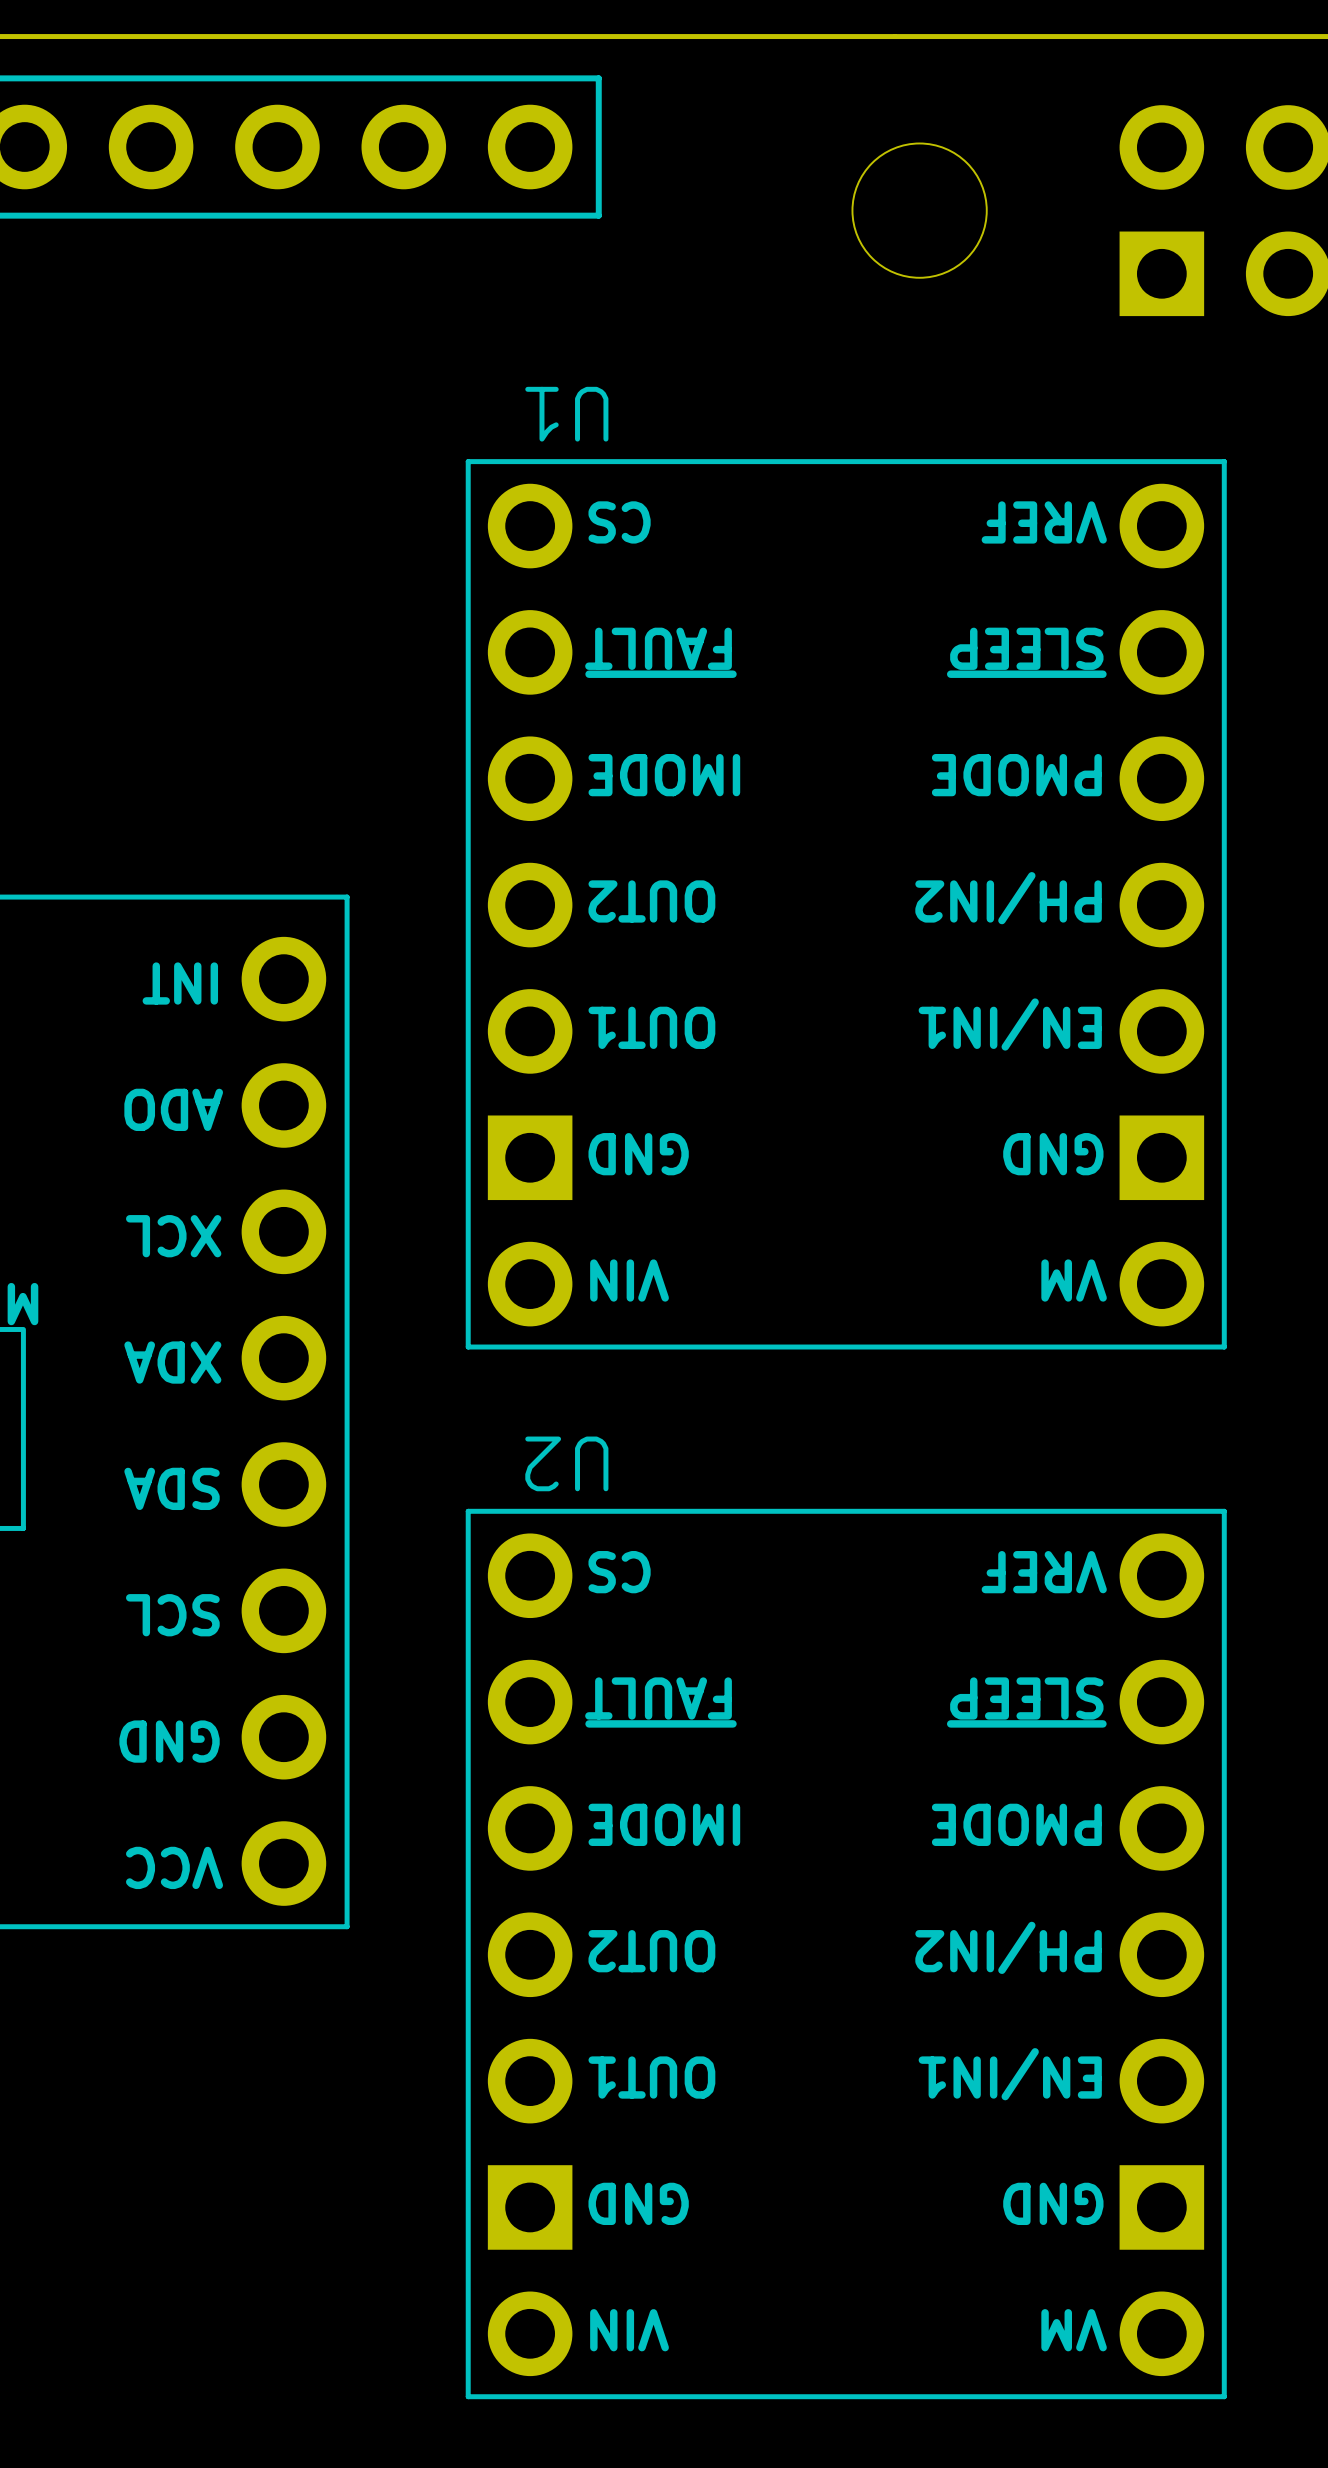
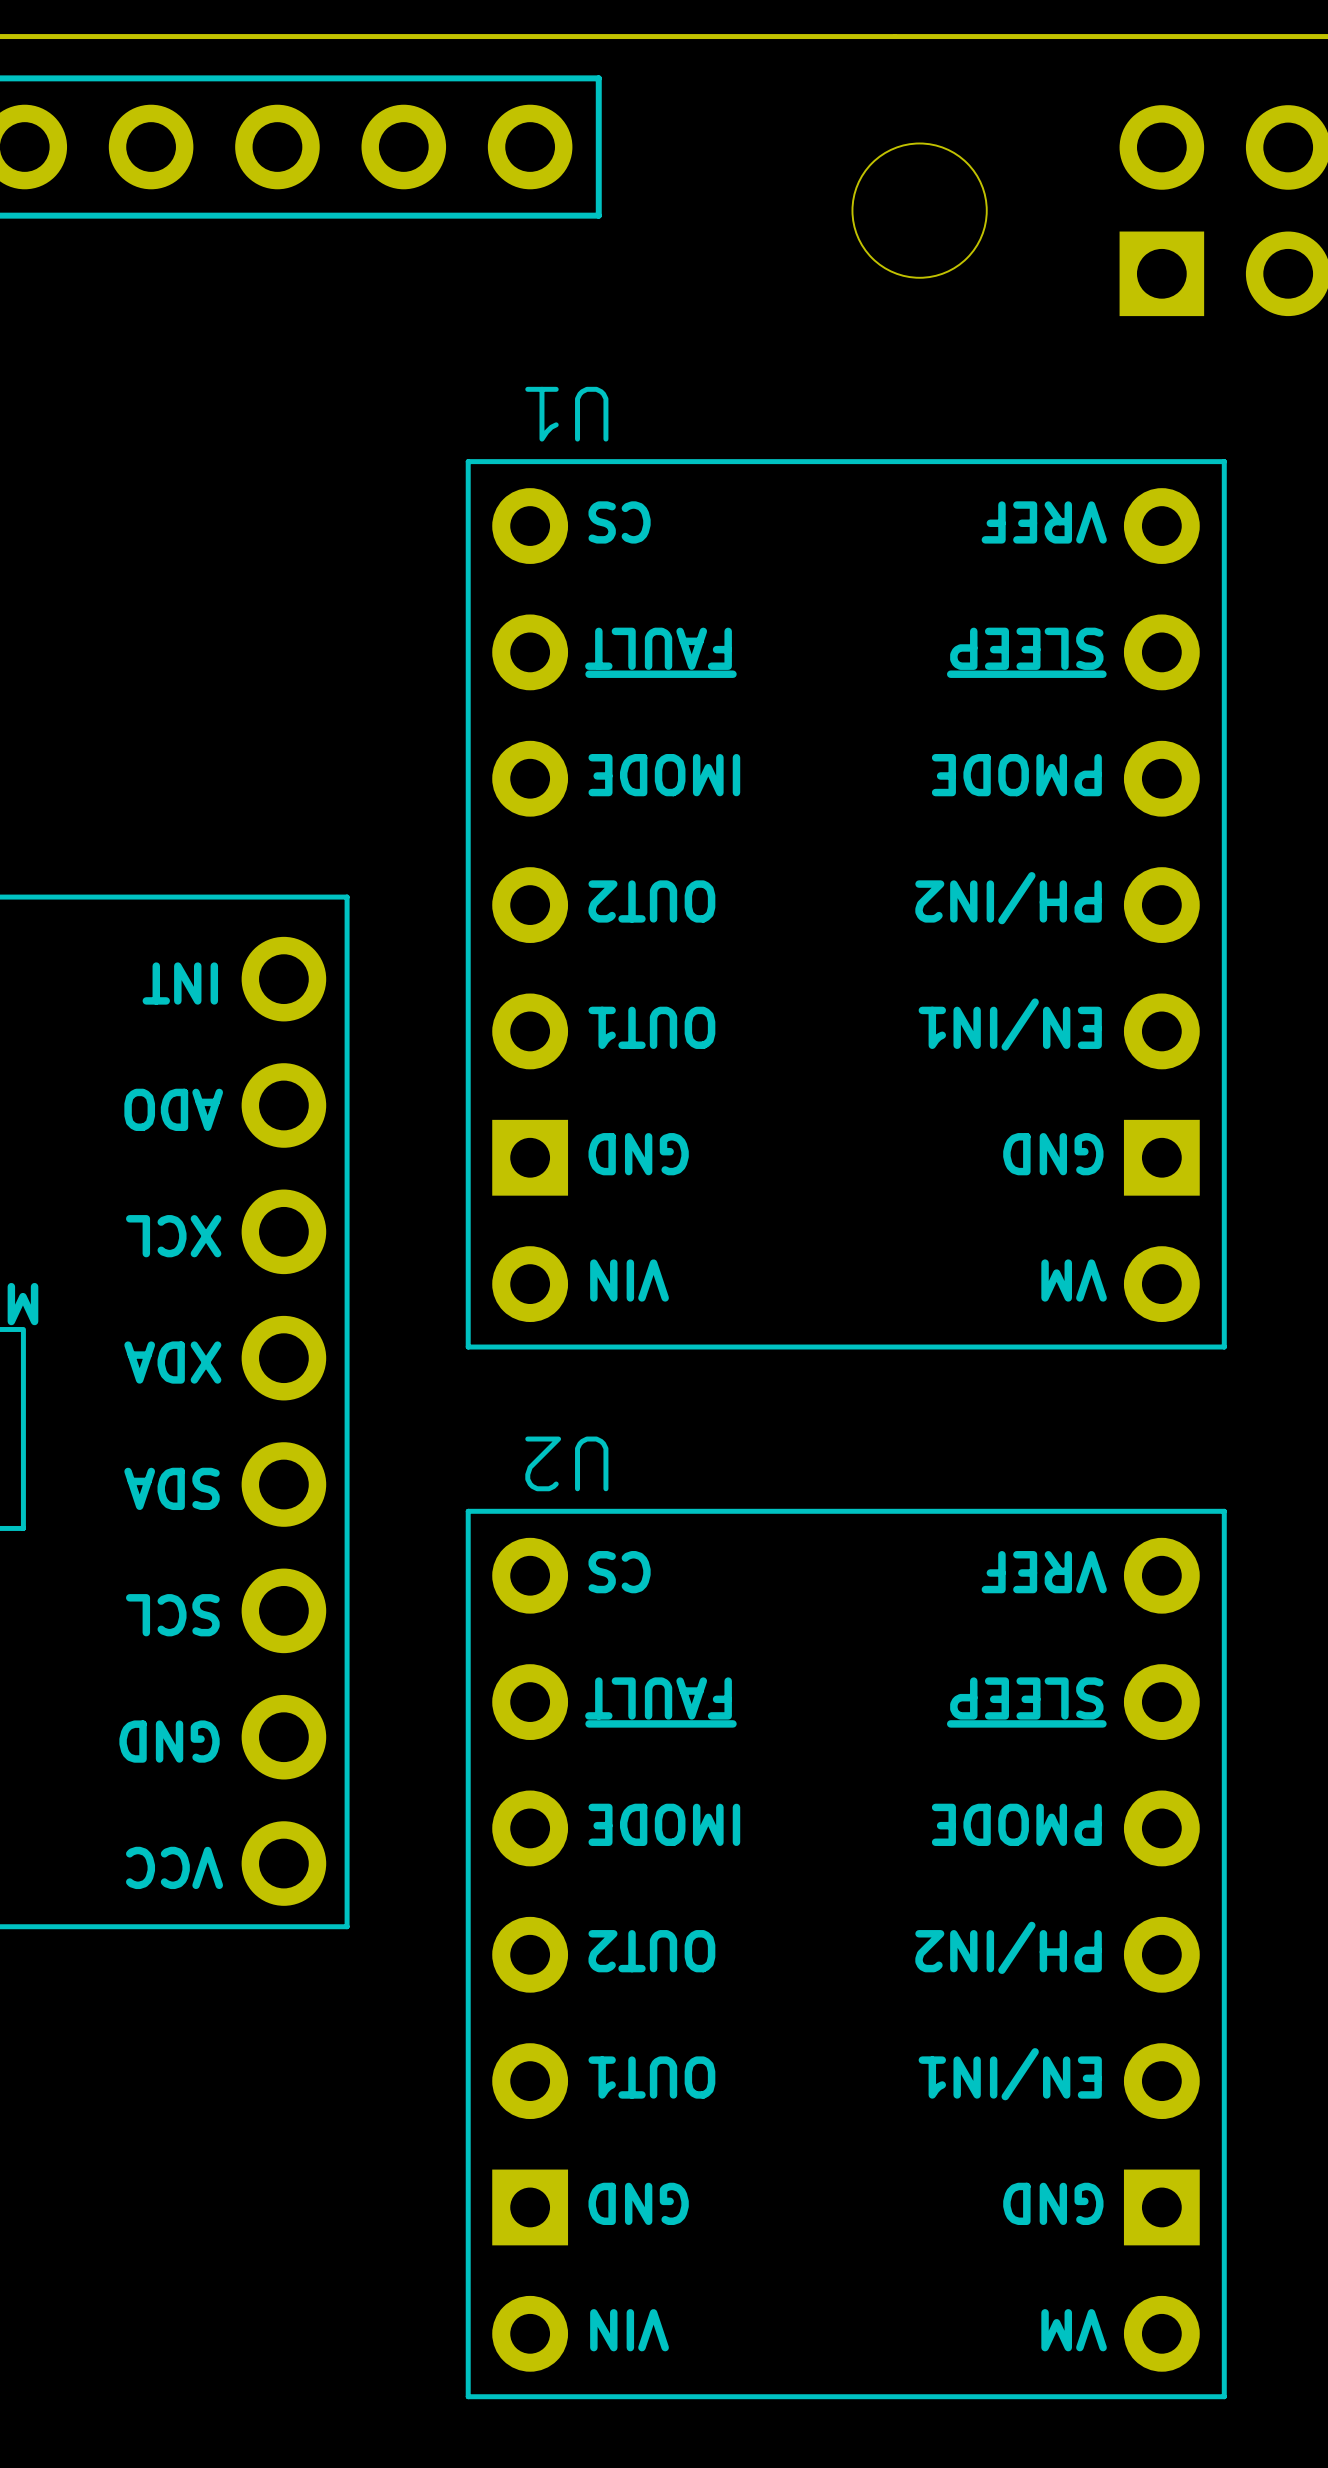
U1 footprint: [465, 459, 1227, 1350] -> [465, 459, 1227, 1350]
U2 footprint: [465, 1508, 1227, 2400] -> [465, 1508, 1227, 2400]

